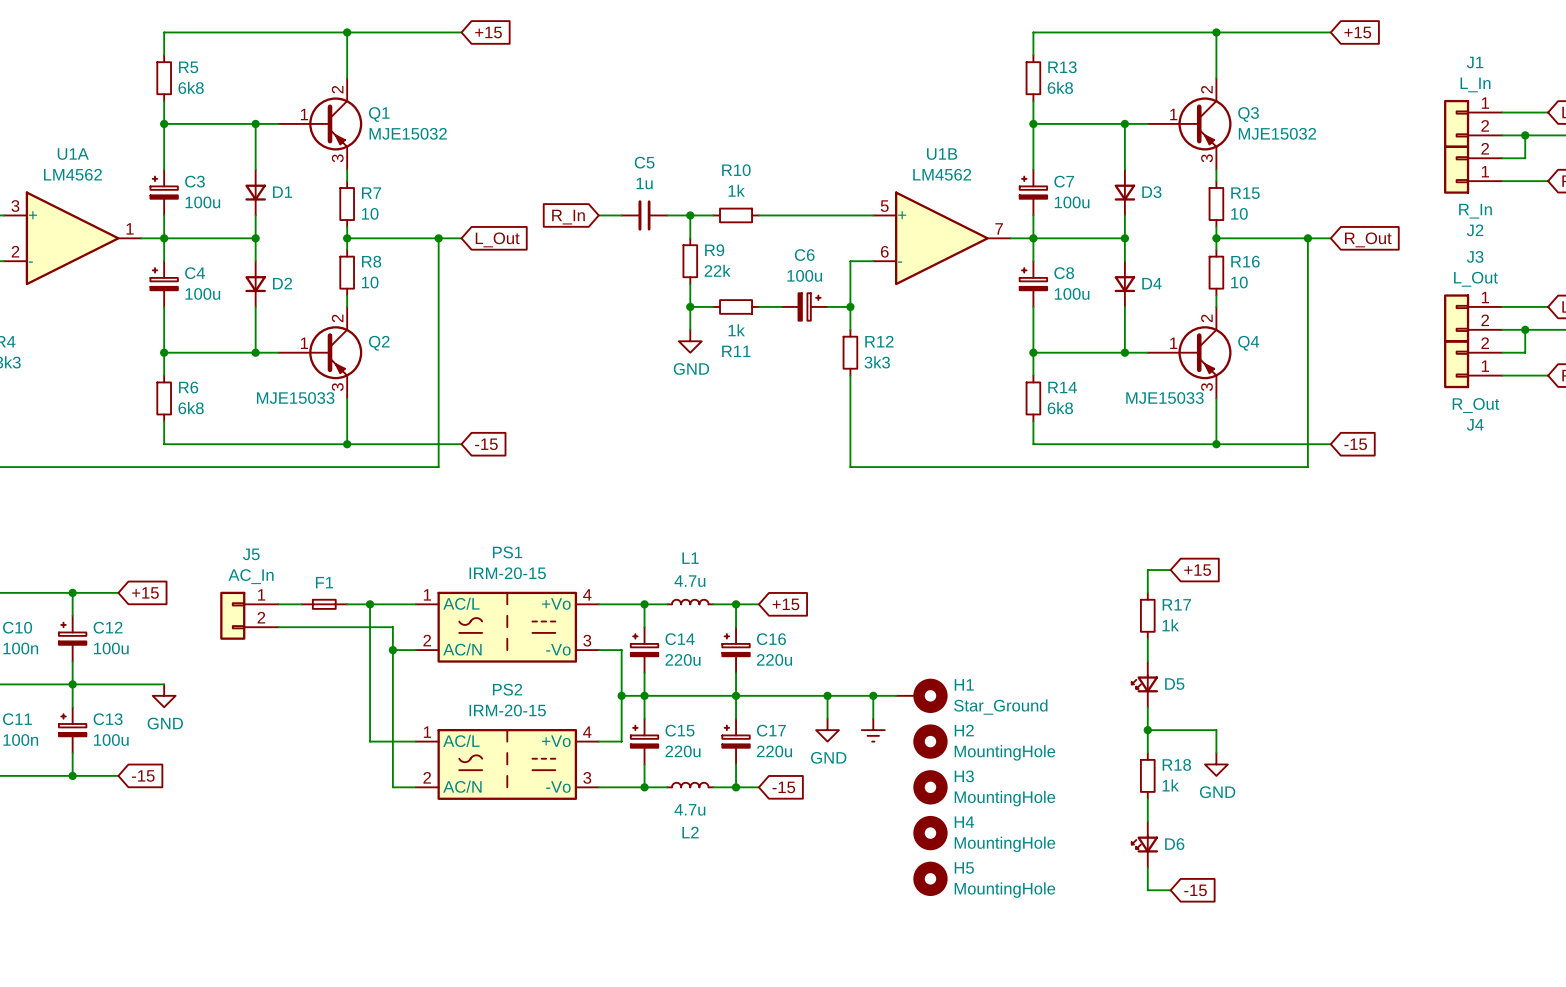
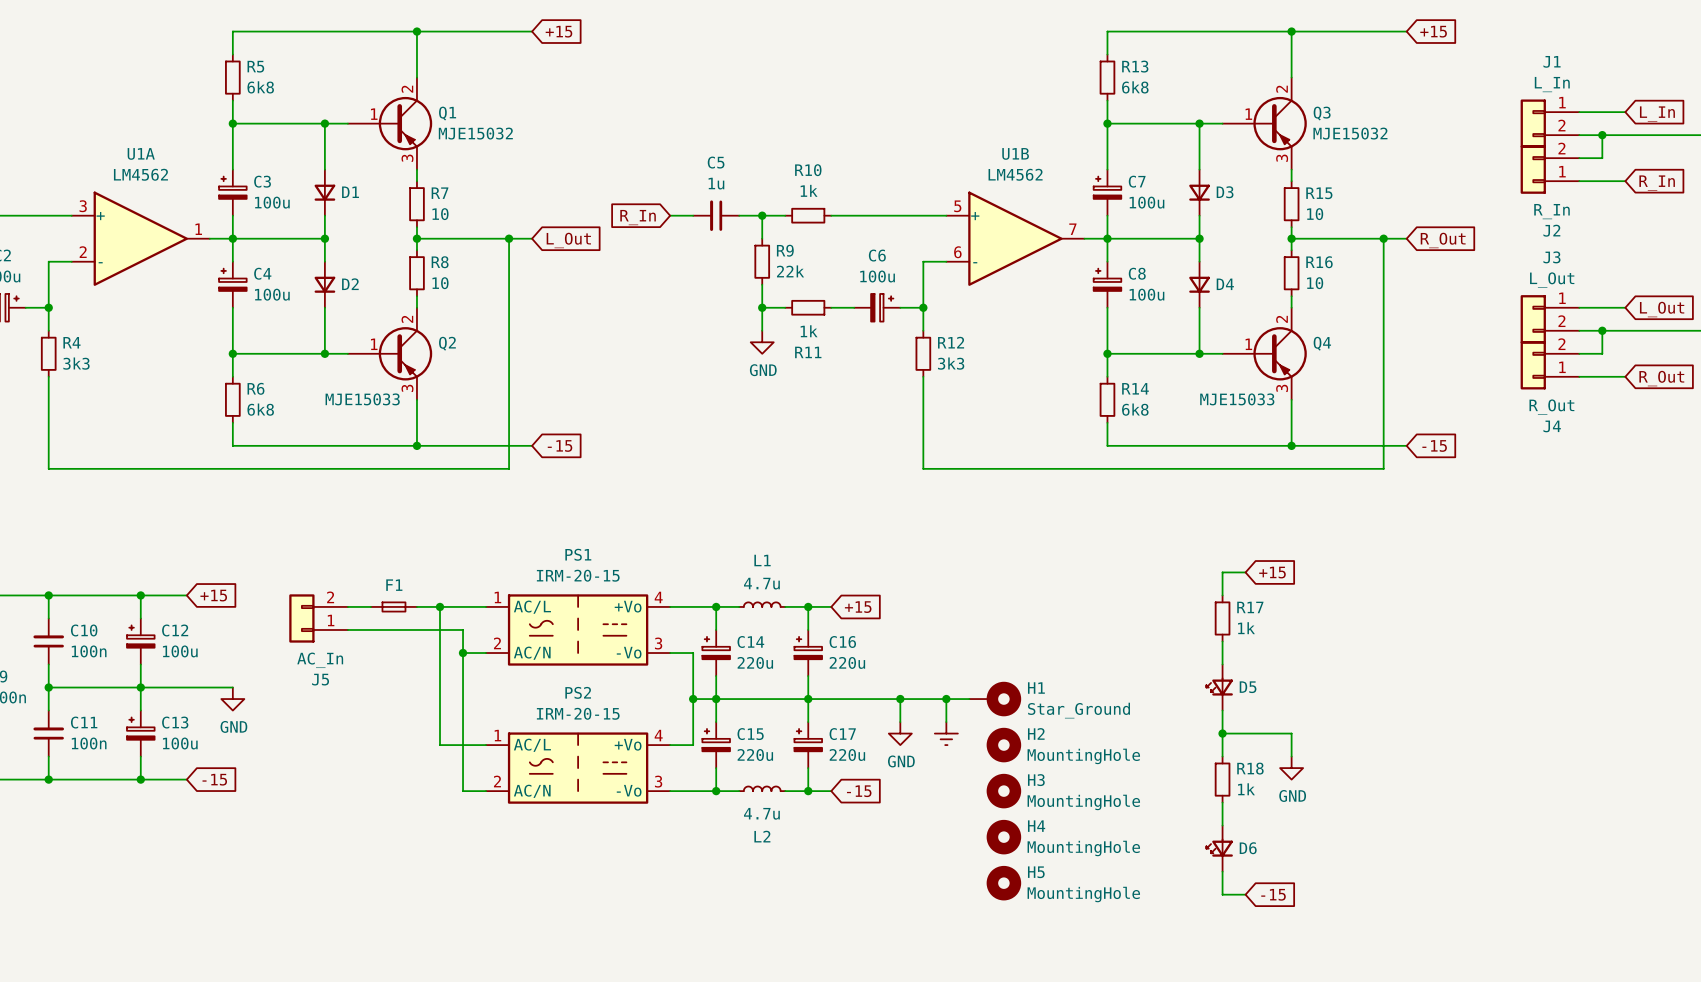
J5 flip: as is (232, 615) -> up-down (301, 618)

